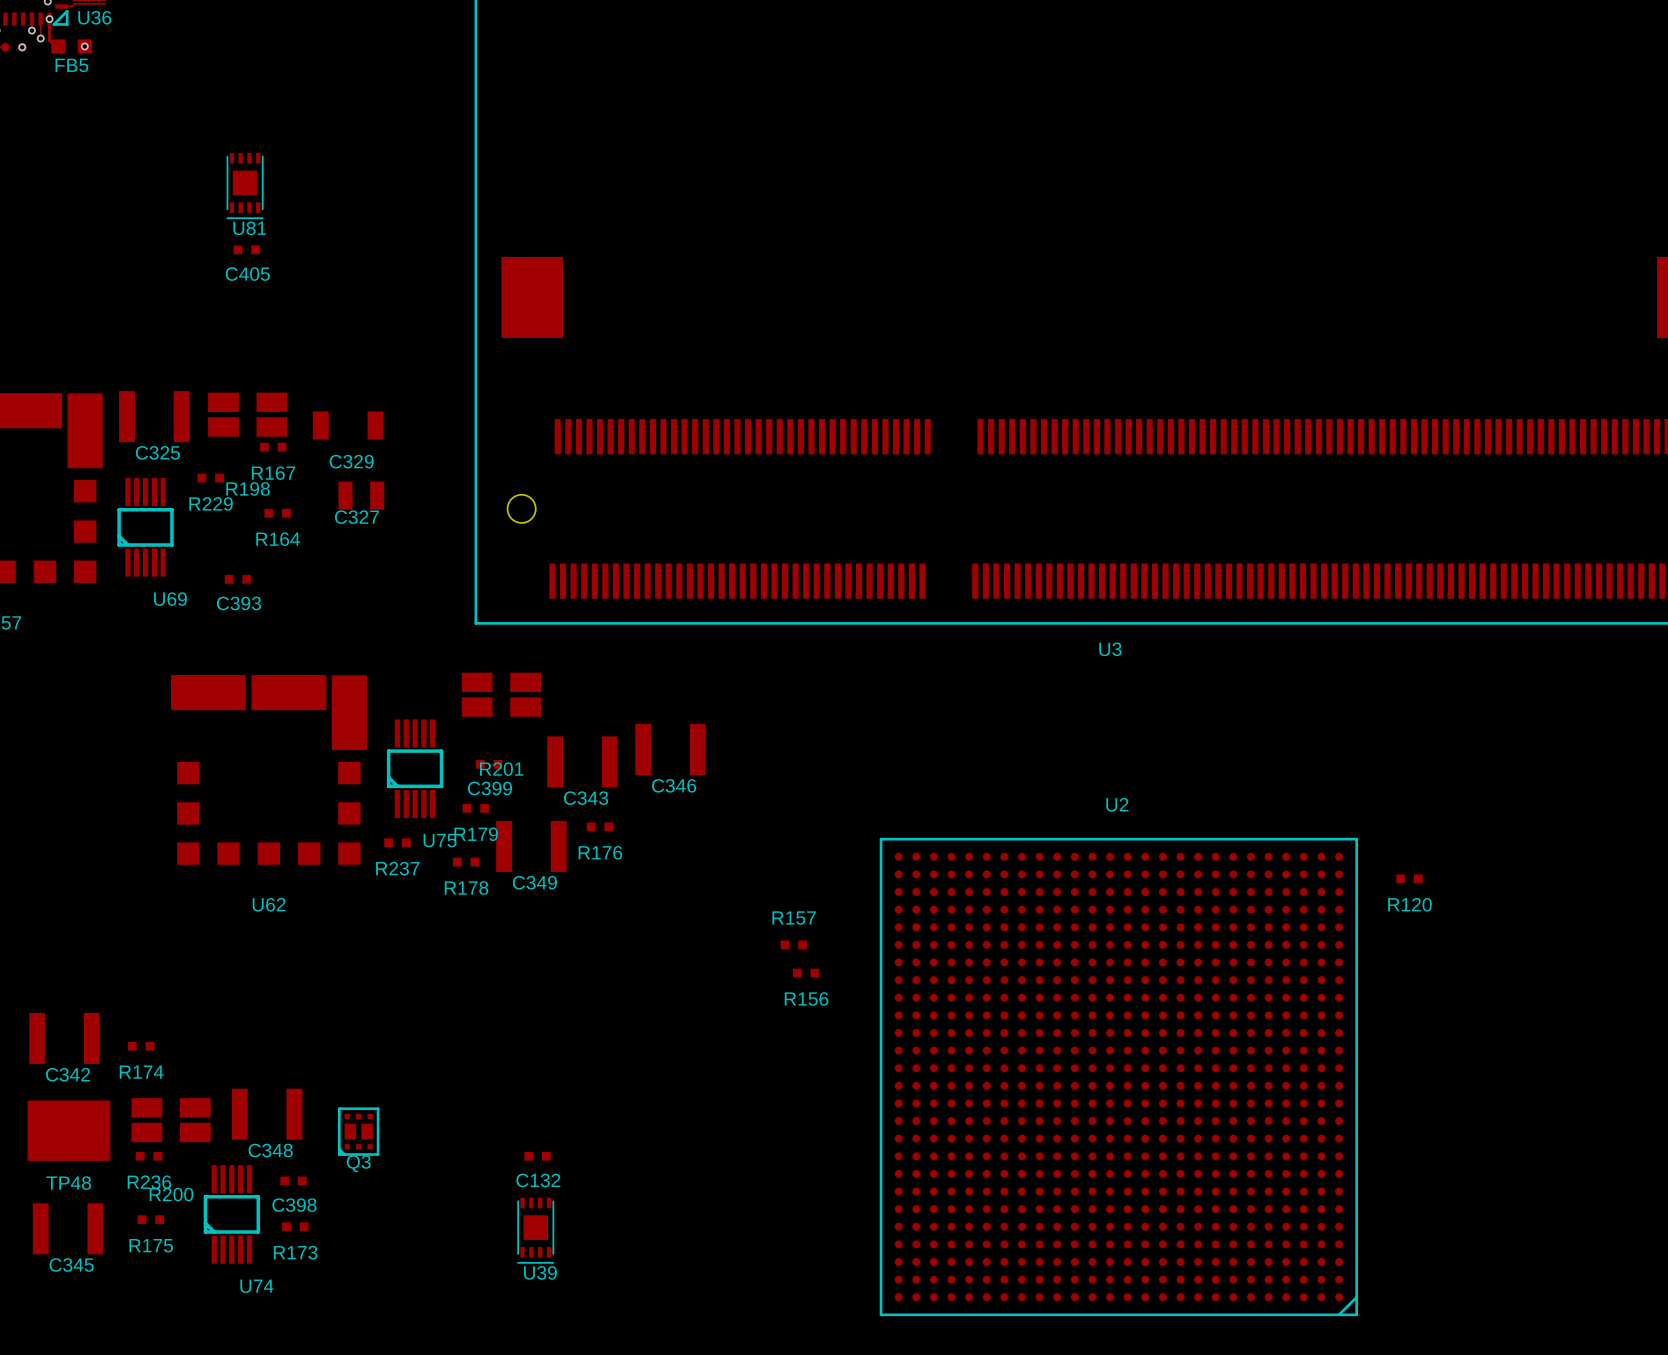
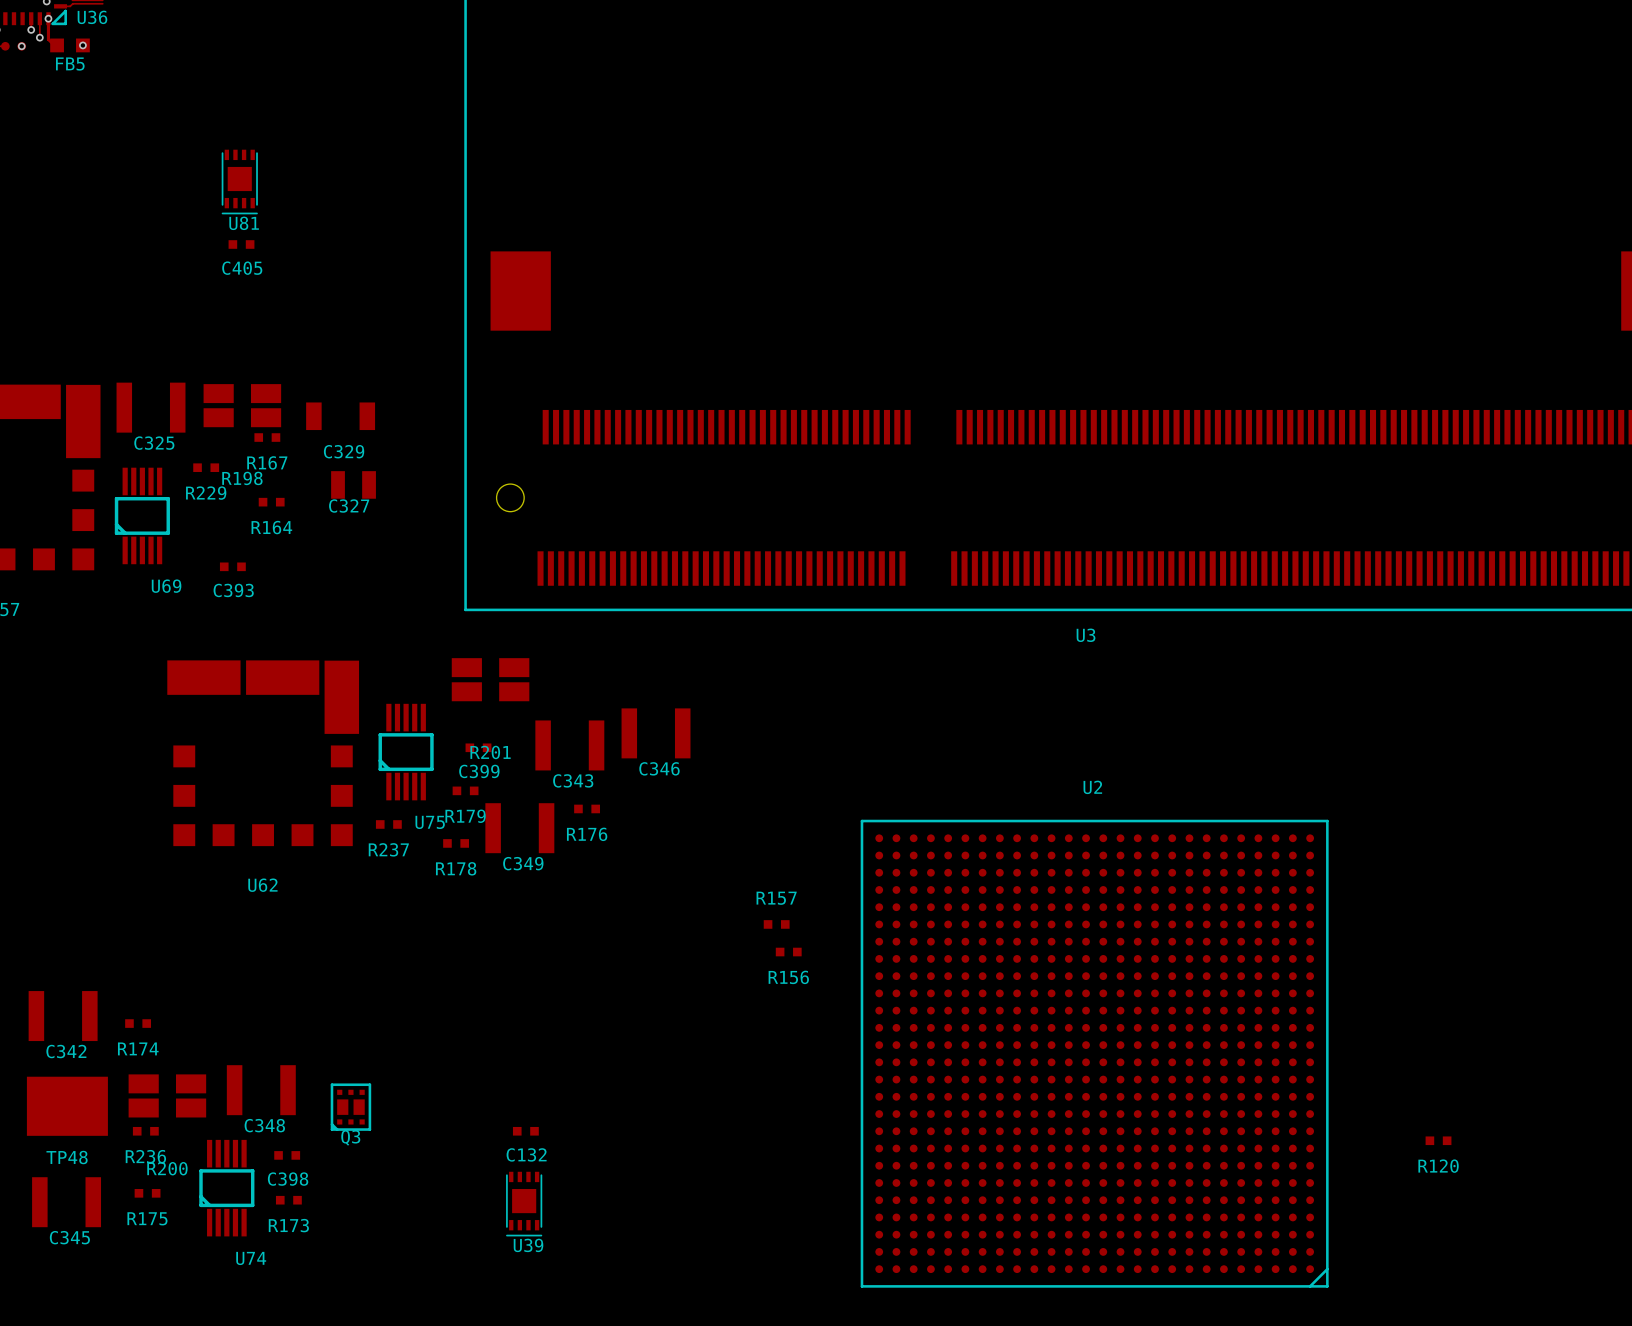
R120 position: (1409, 878) -> (1438, 1140)

